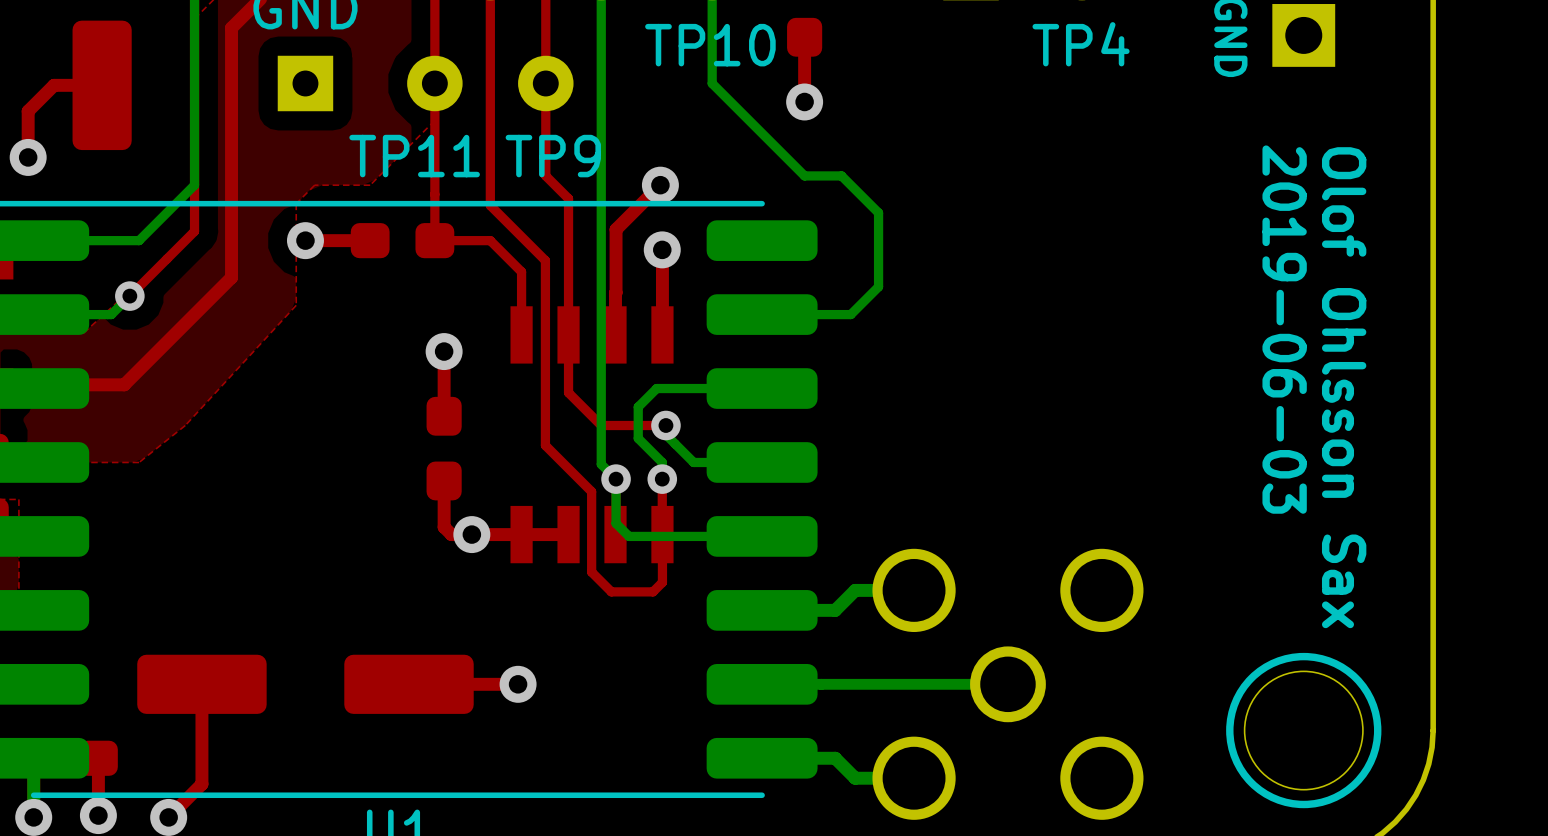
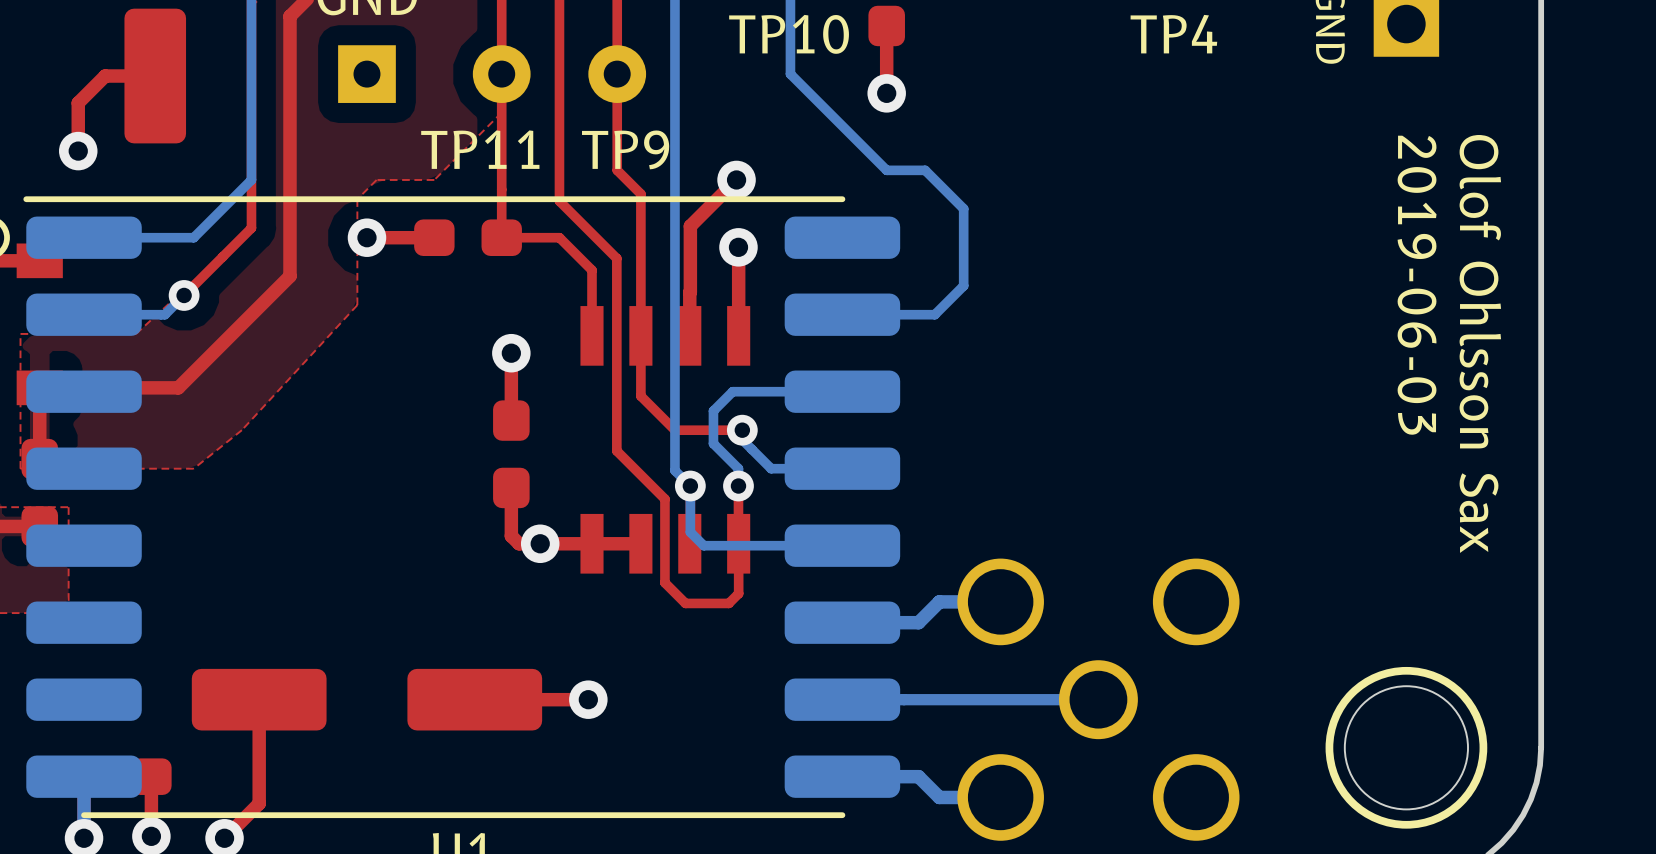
text position: 2019-06-03 (1284, 329) -> 2019-06-03 (1417, 285)
text position: Olof Ohlsson Sax (1344, 387) -> Olof Ohlsson Sax (1480, 343)

